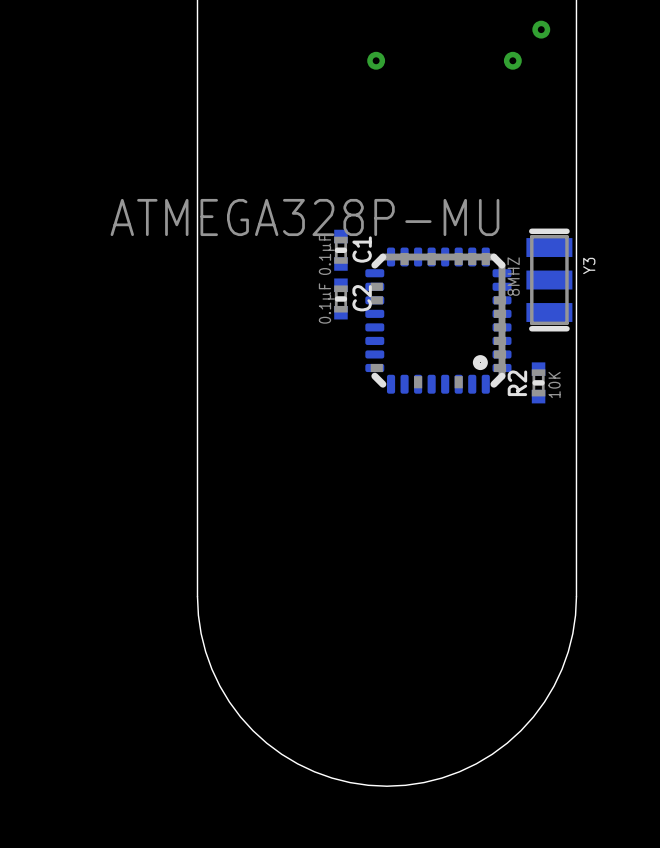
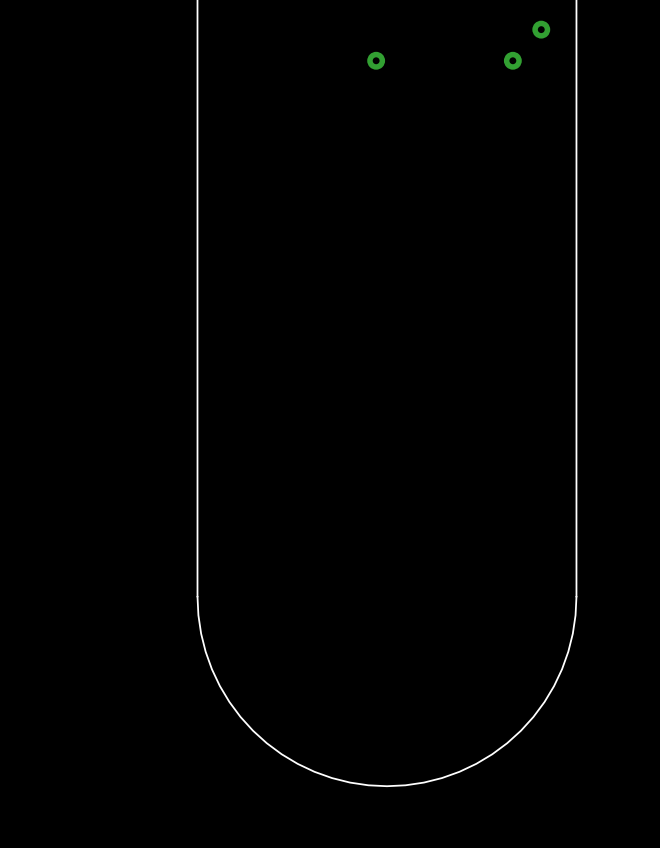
C1: 0.1µF (340, 250) -> none
Y3: 8MHZ (549, 280) -> none
C2: 0.1µF (340, 298) -> none
part: ATMEGA328P-MU (438, 320) -> none
R2: 10K (538, 382) -> none

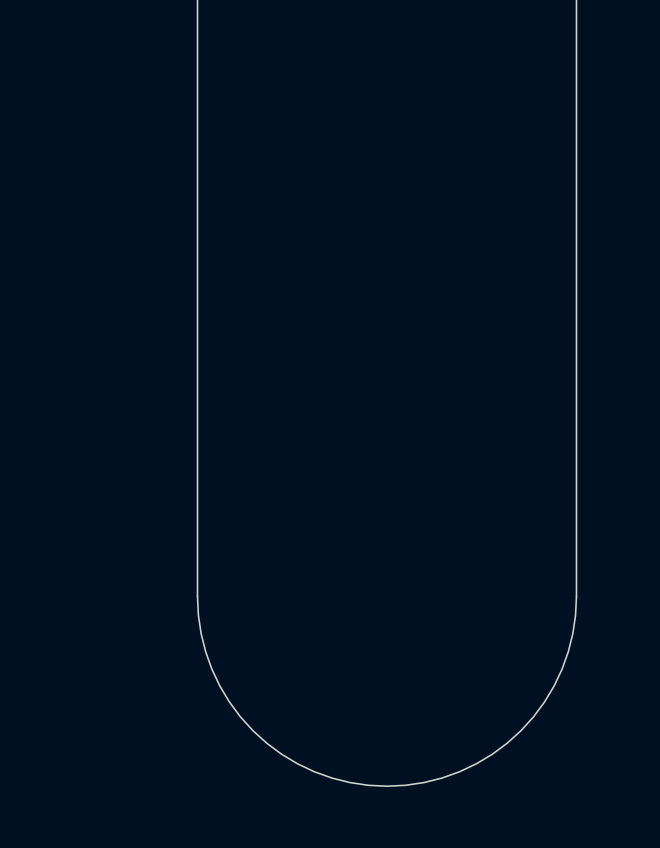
via: (541, 29) -> none
via: (376, 60) -> none
via: (512, 60) -> none

